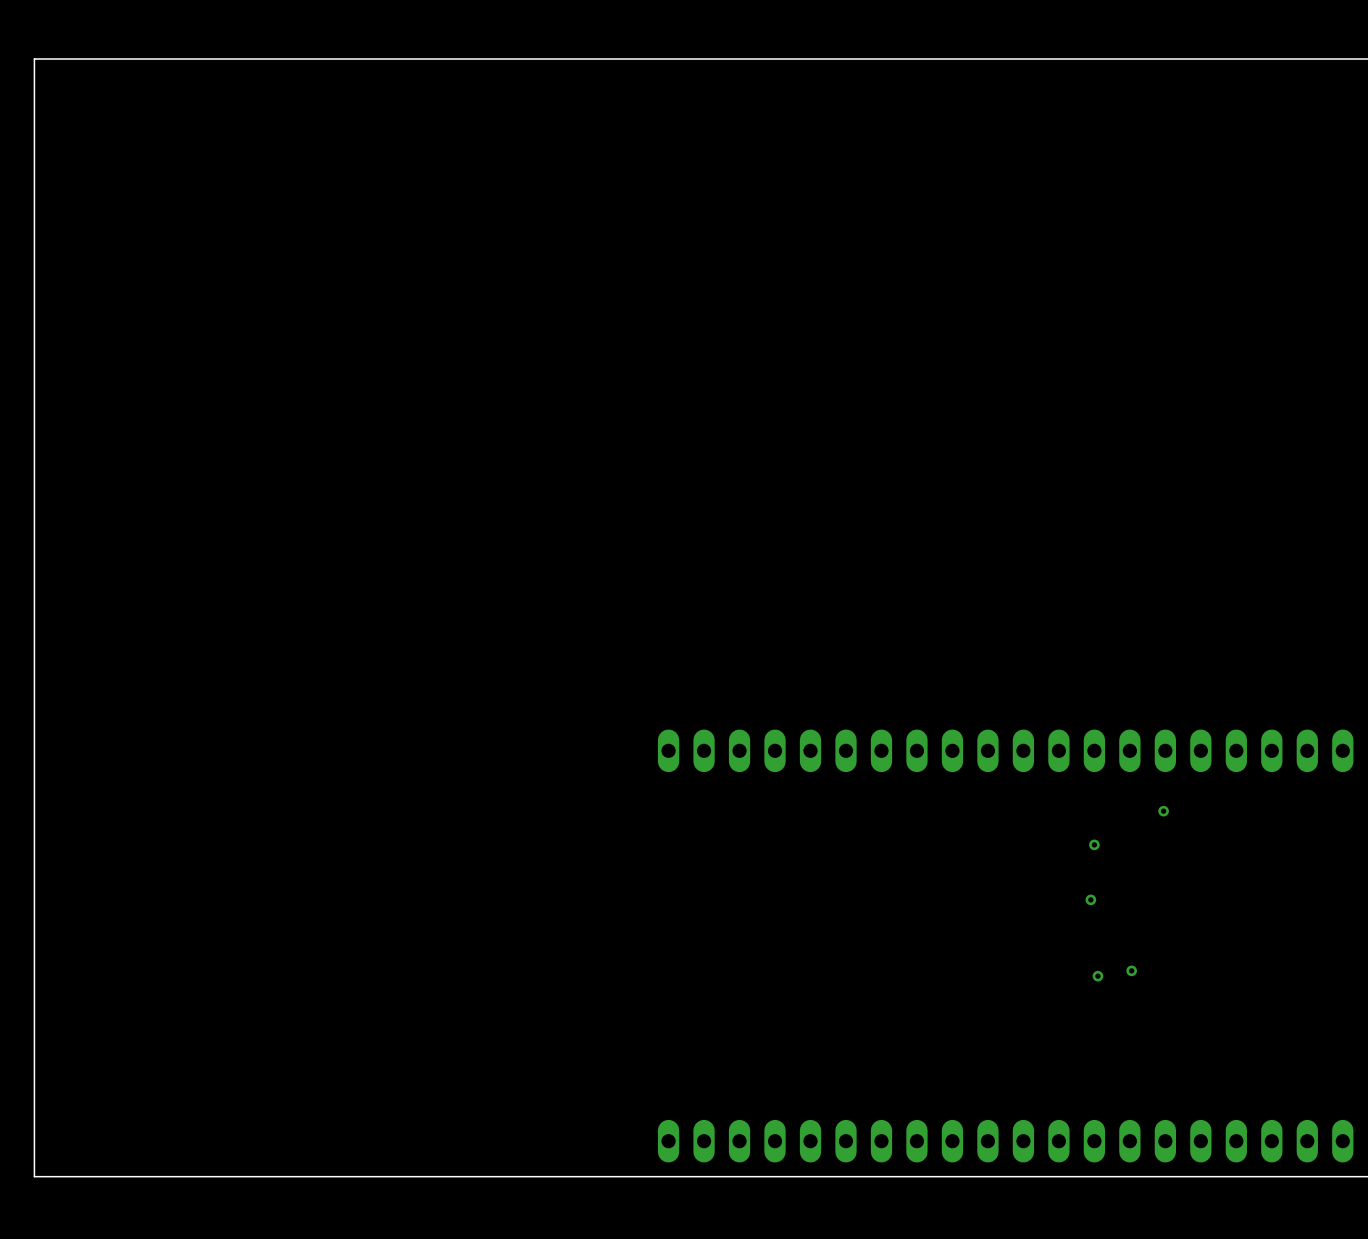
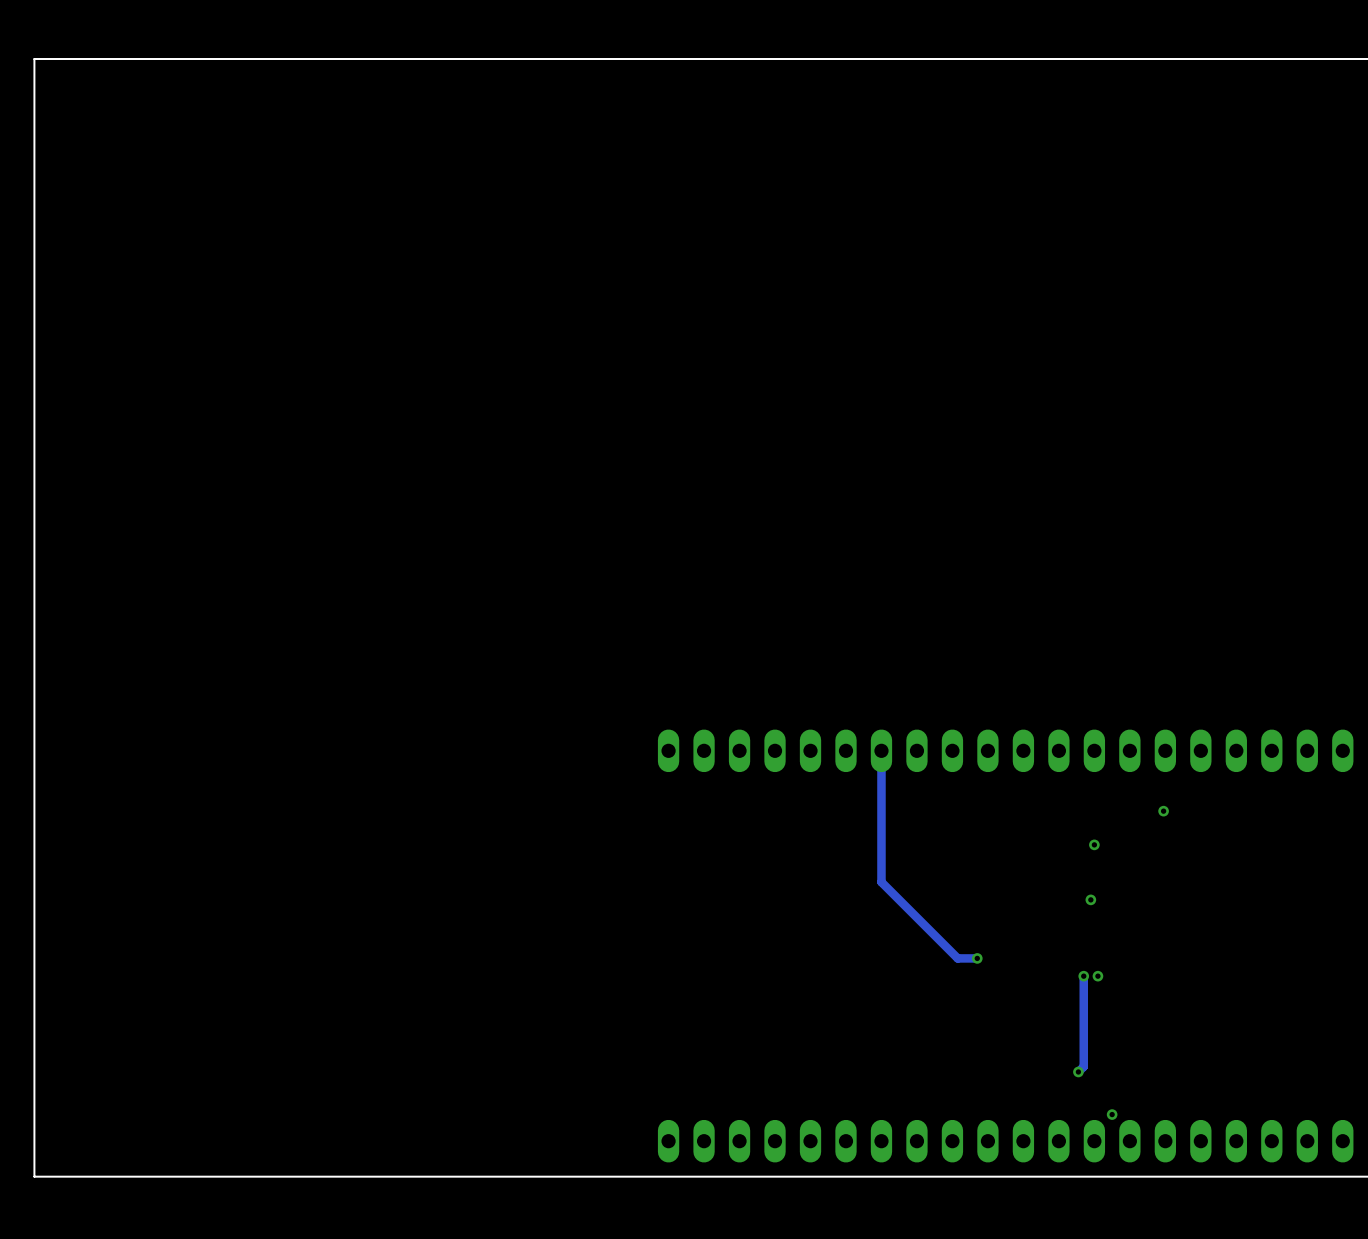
track: none -> (881, 750) (881, 882) (957, 958) (977, 958)
via: none -> (977, 958)
via position: (1131, 970) -> (1083, 976)
track: none -> (1083, 976) (1083, 1066) (1078, 1071)
via: none -> (1078, 1071)
via: none -> (1112, 1114)

